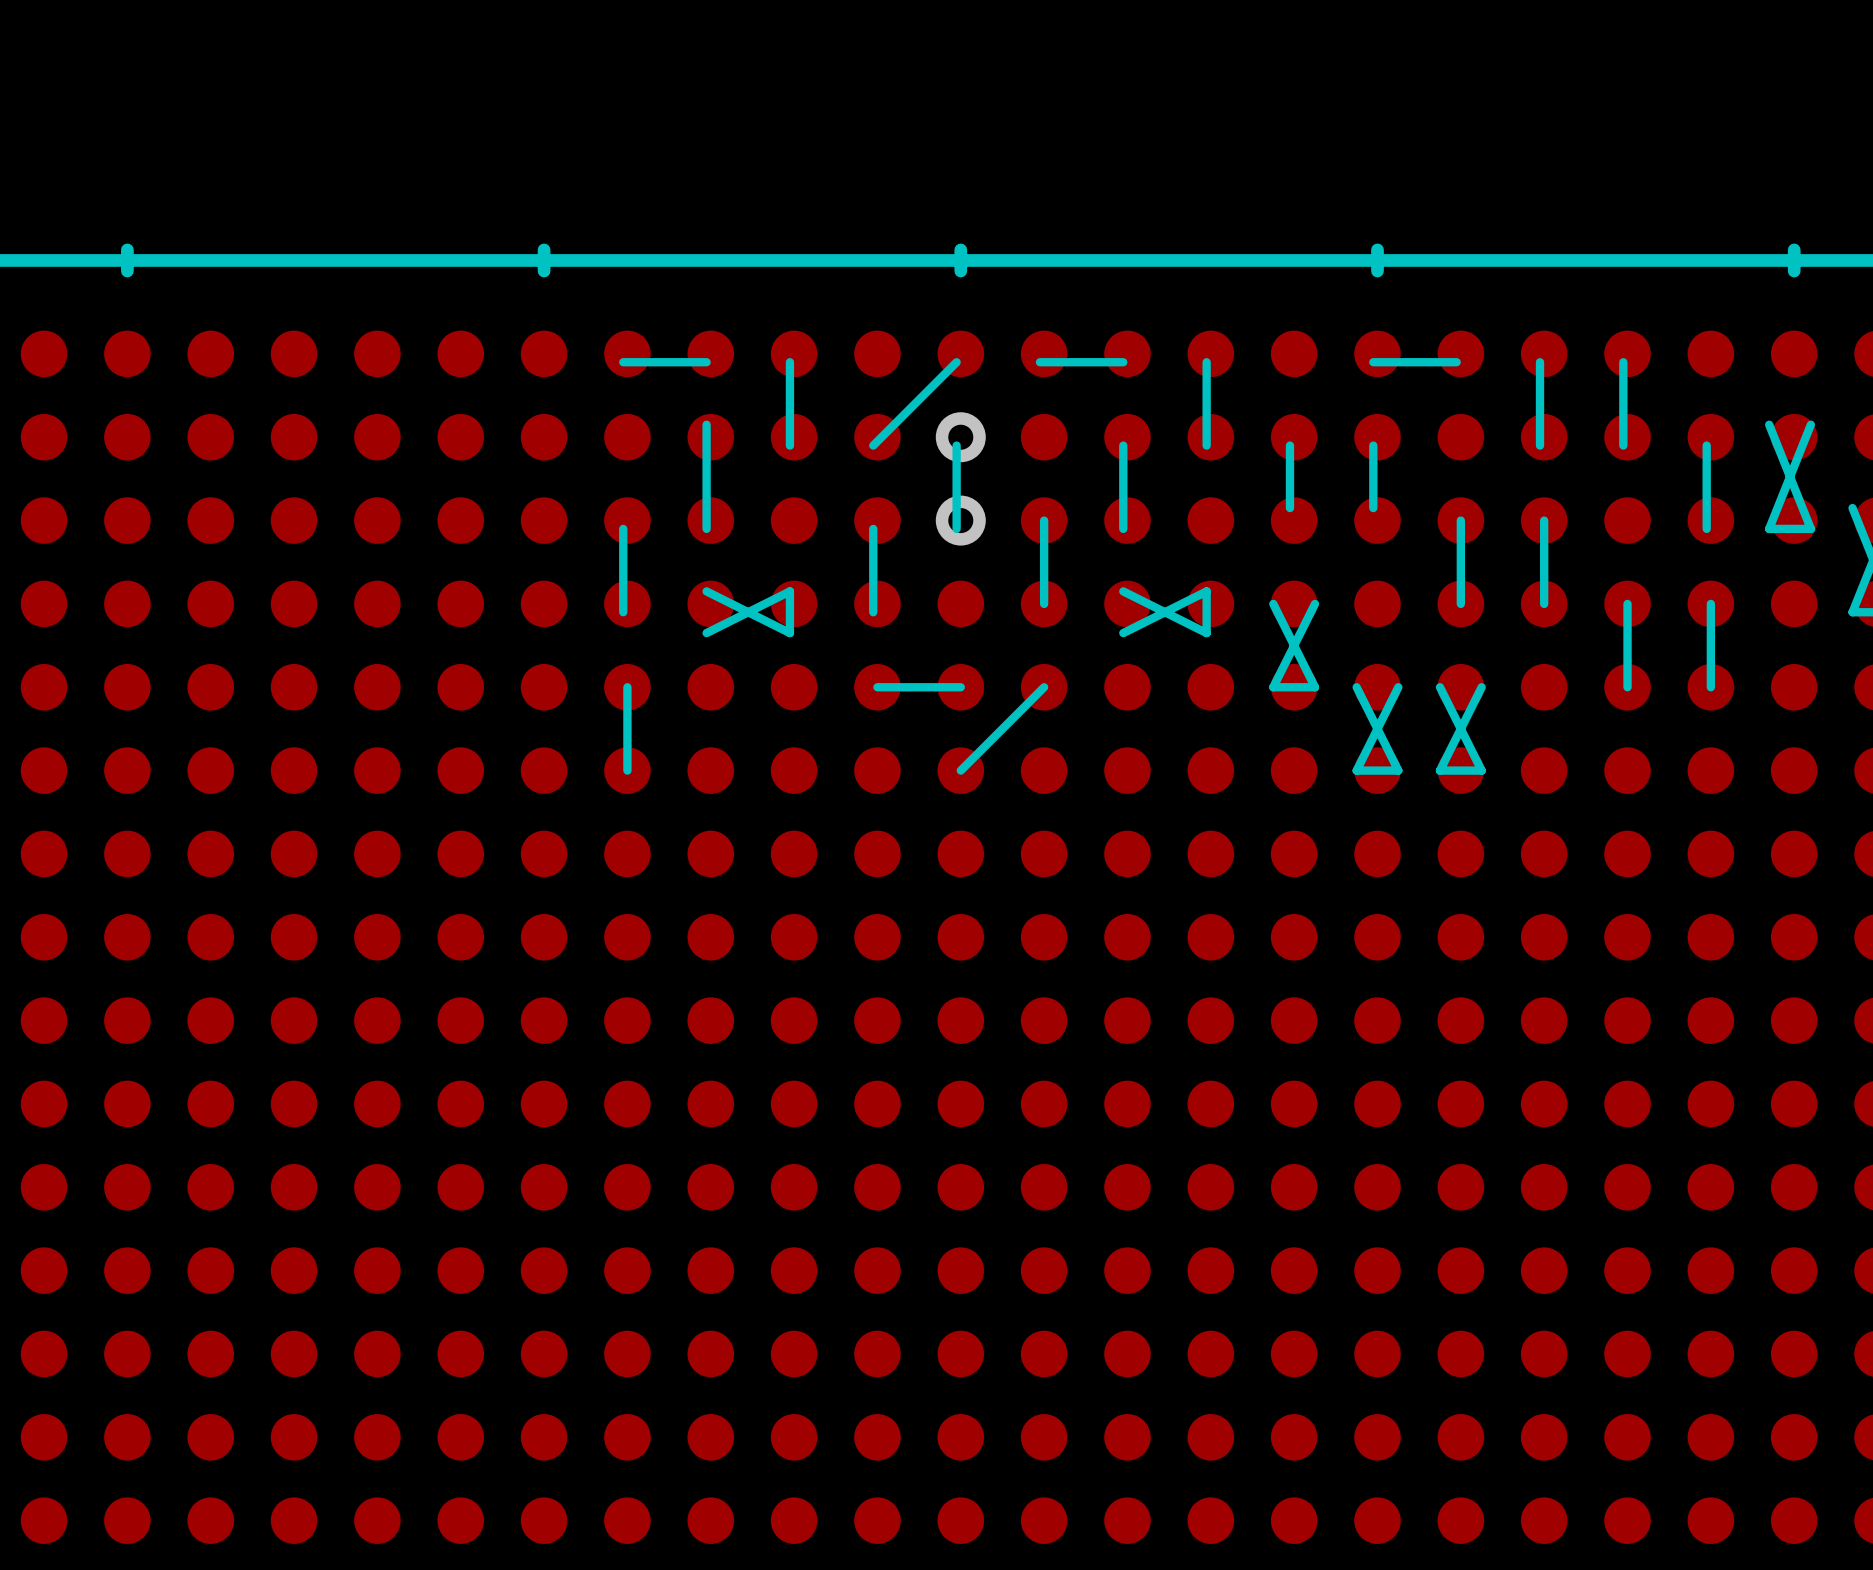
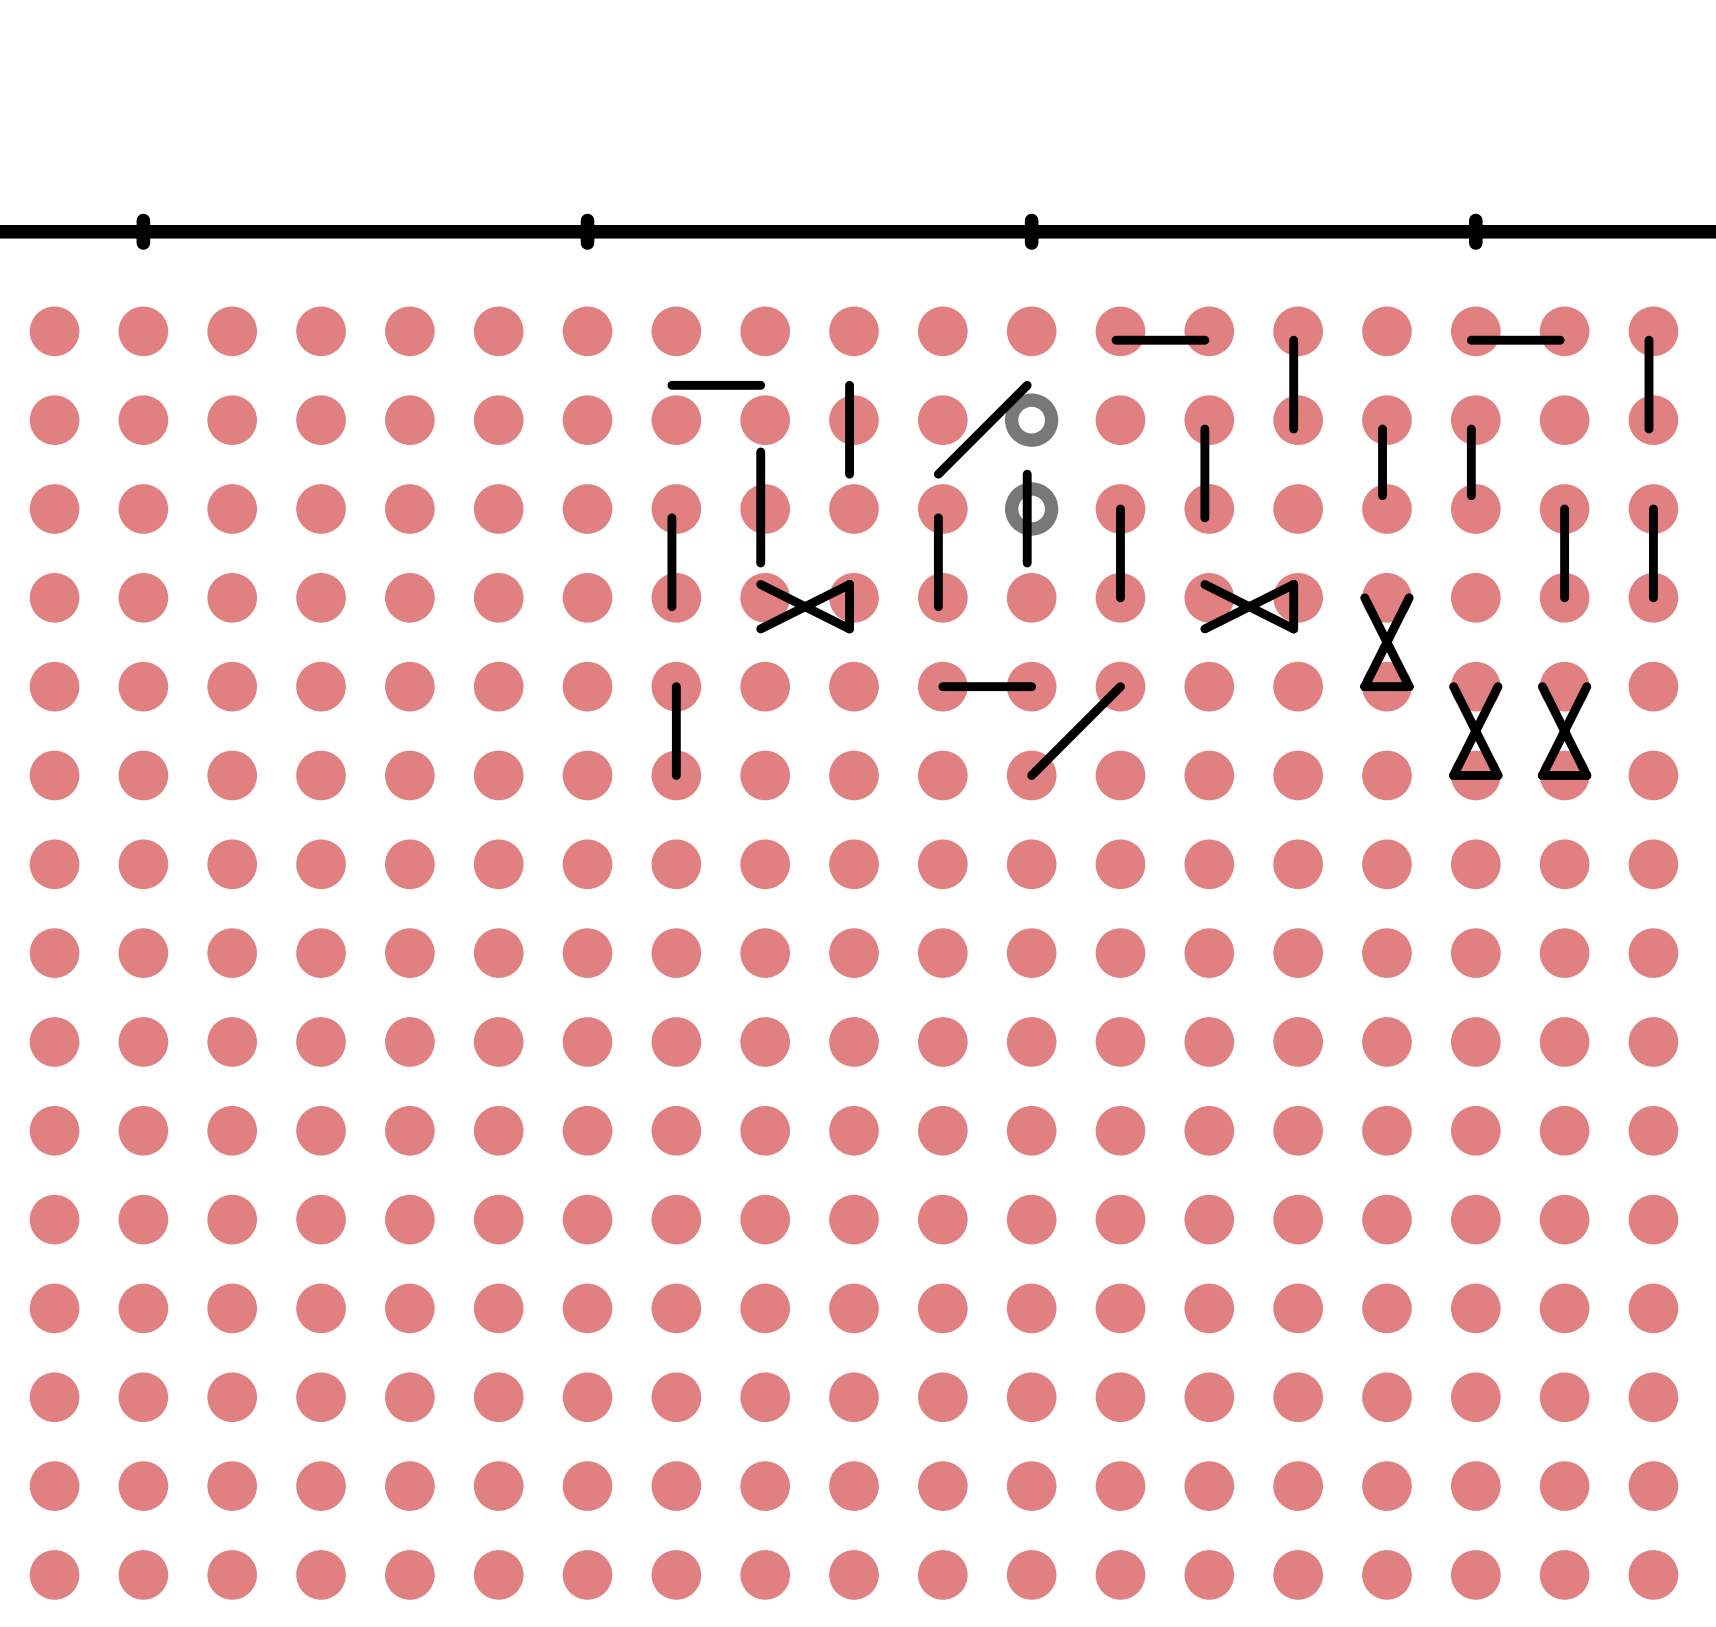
line: (623, 362) (706, 362) -> (671, 385) (760, 385)
line: (789, 362) (789, 404) -> (849, 429) (849, 474)
line: (956, 362) (873, 445) -> (1027, 385) (938, 474)
line: (706, 424) (706, 467) -> (760, 517) (760, 563)
line: (956, 445) (956, 487) -> (1027, 517) (1027, 563)

